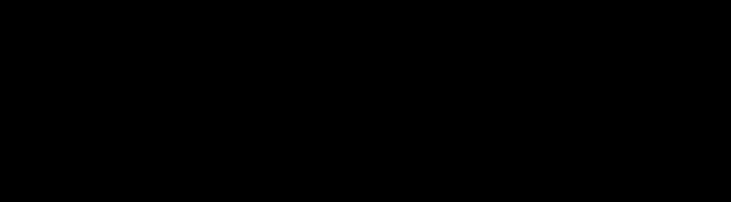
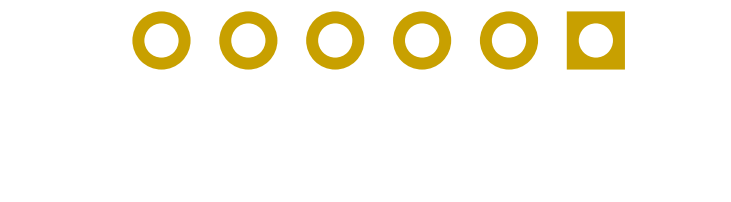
part: none -> (378, 40)

